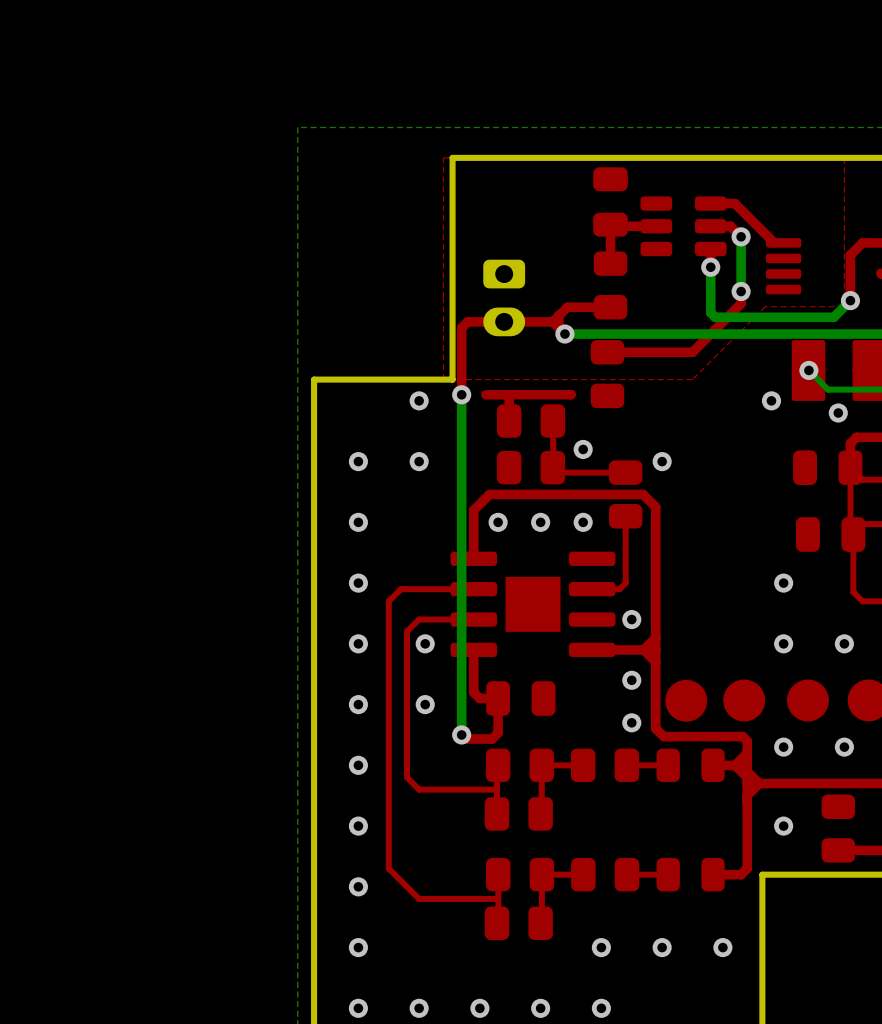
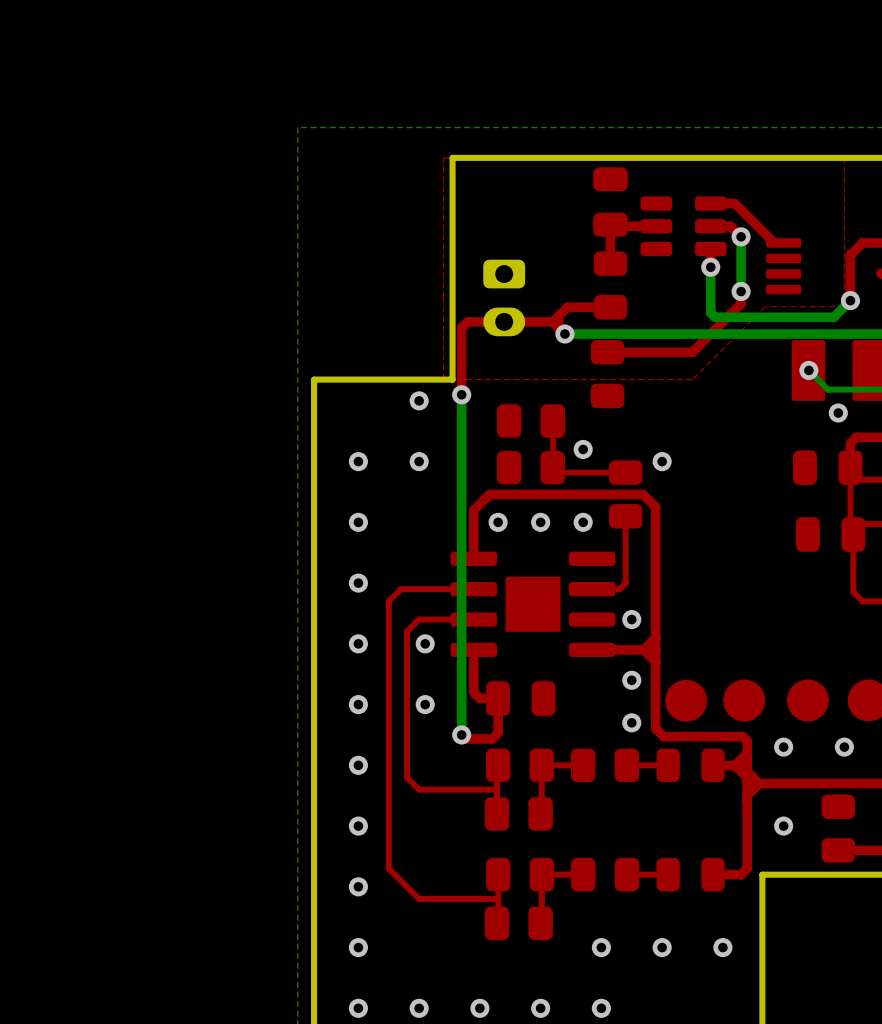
top track: (510, 394) (485, 394) -> none
top track: (570, 394) (510, 394) (509, 420) -> none
via: (771, 400) -> none
via: (783, 583) -> none
via: (783, 643) -> none
via: (844, 643) -> none

